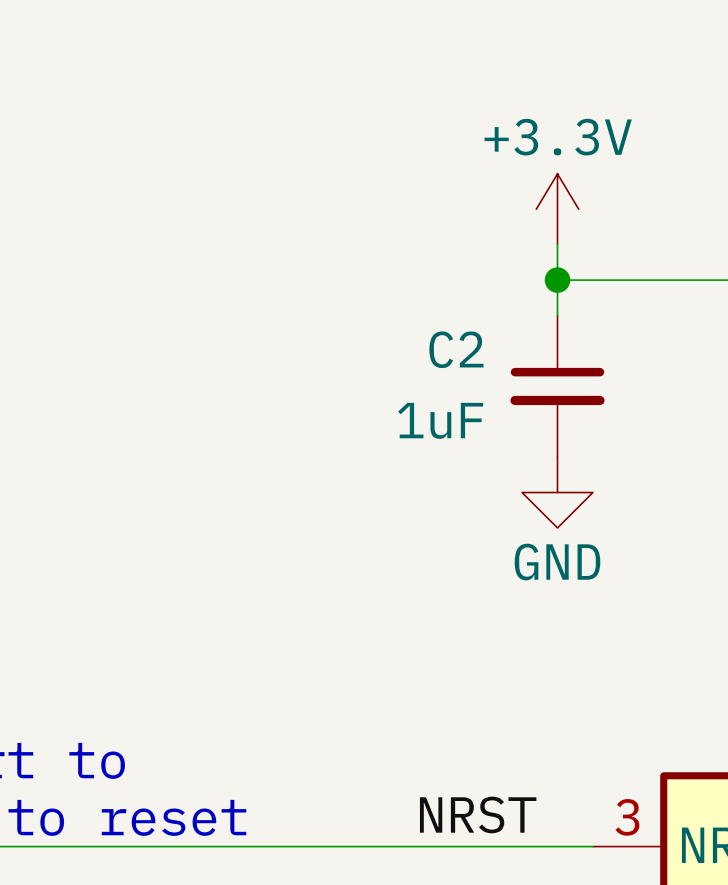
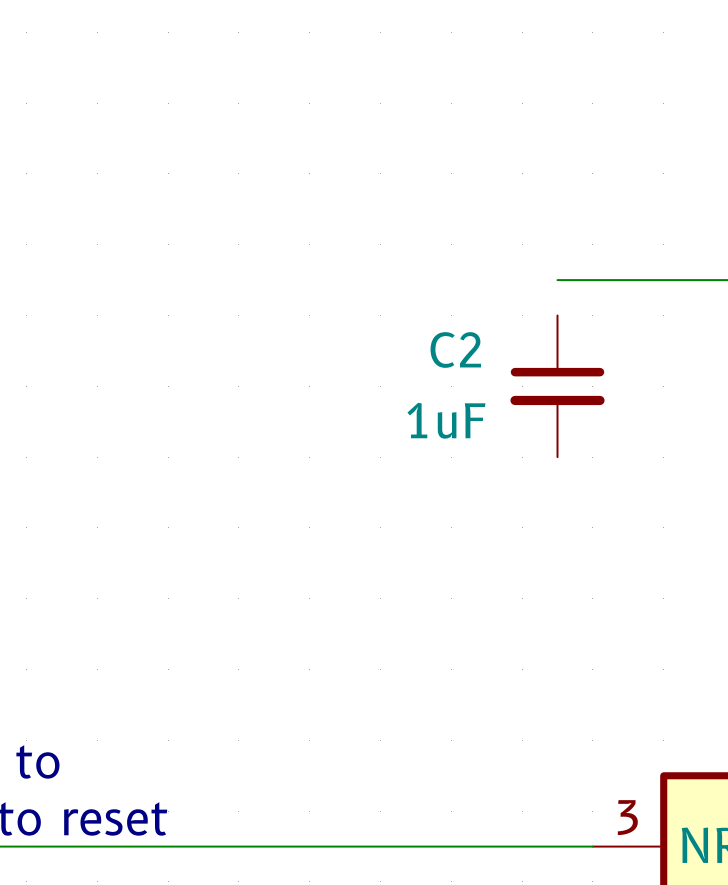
power symbol: +3.3V (557, 209) -> none
wire: (557, 244) (557, 315) -> none
junction: (557, 280) -> none
power symbol: GND (557, 492) -> none
label: NRST (478, 814) -> none

